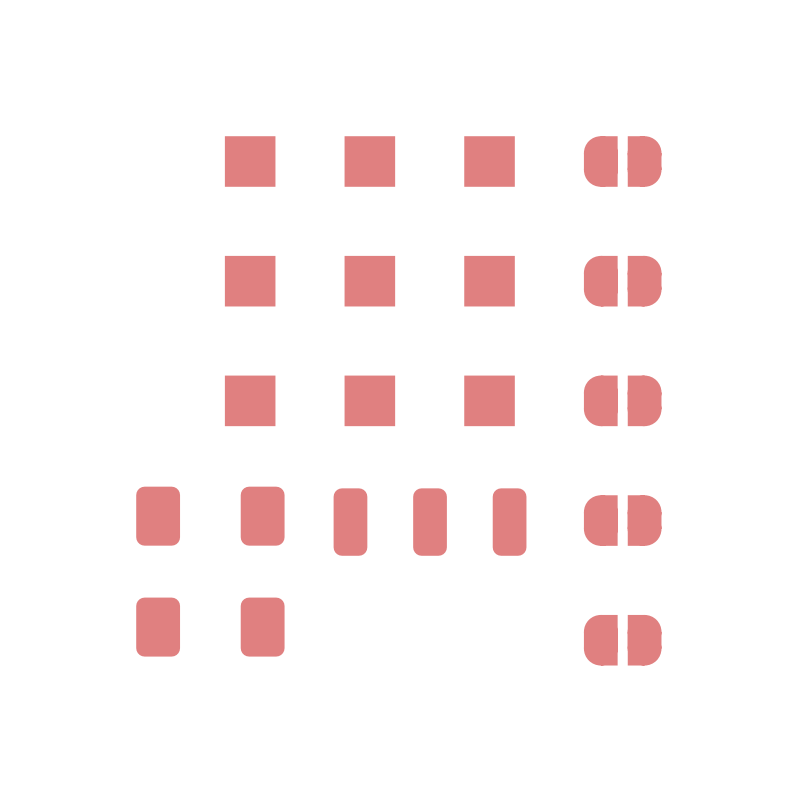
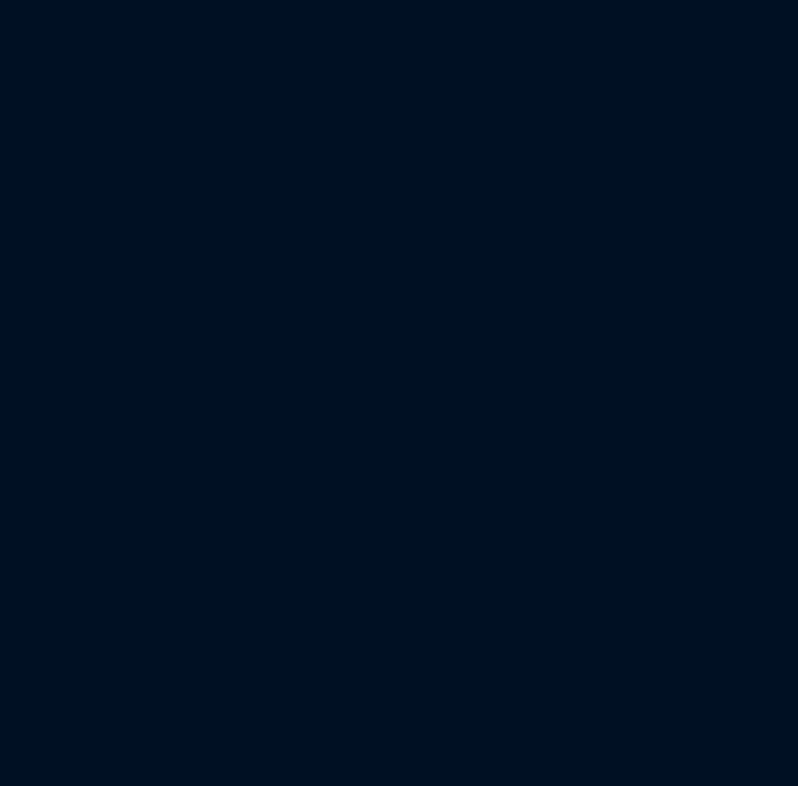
part: (250, 161) -> none
part: (369, 161) -> none
part: (489, 161) -> none
part: (622, 161) -> none
part: (250, 281) -> none
part: (369, 281) -> none
part: (489, 281) -> none
part: (622, 281) -> none
part: (250, 400) -> none
part: (369, 400) -> none
part: (489, 400) -> none
part: (622, 400) -> none
part: (210, 516) -> none
part: (622, 520) -> none
part: (350, 522) -> none
part: (430, 522) -> none
part: (509, 522) -> none
part: (210, 627) -> none
part: (622, 640) -> none

